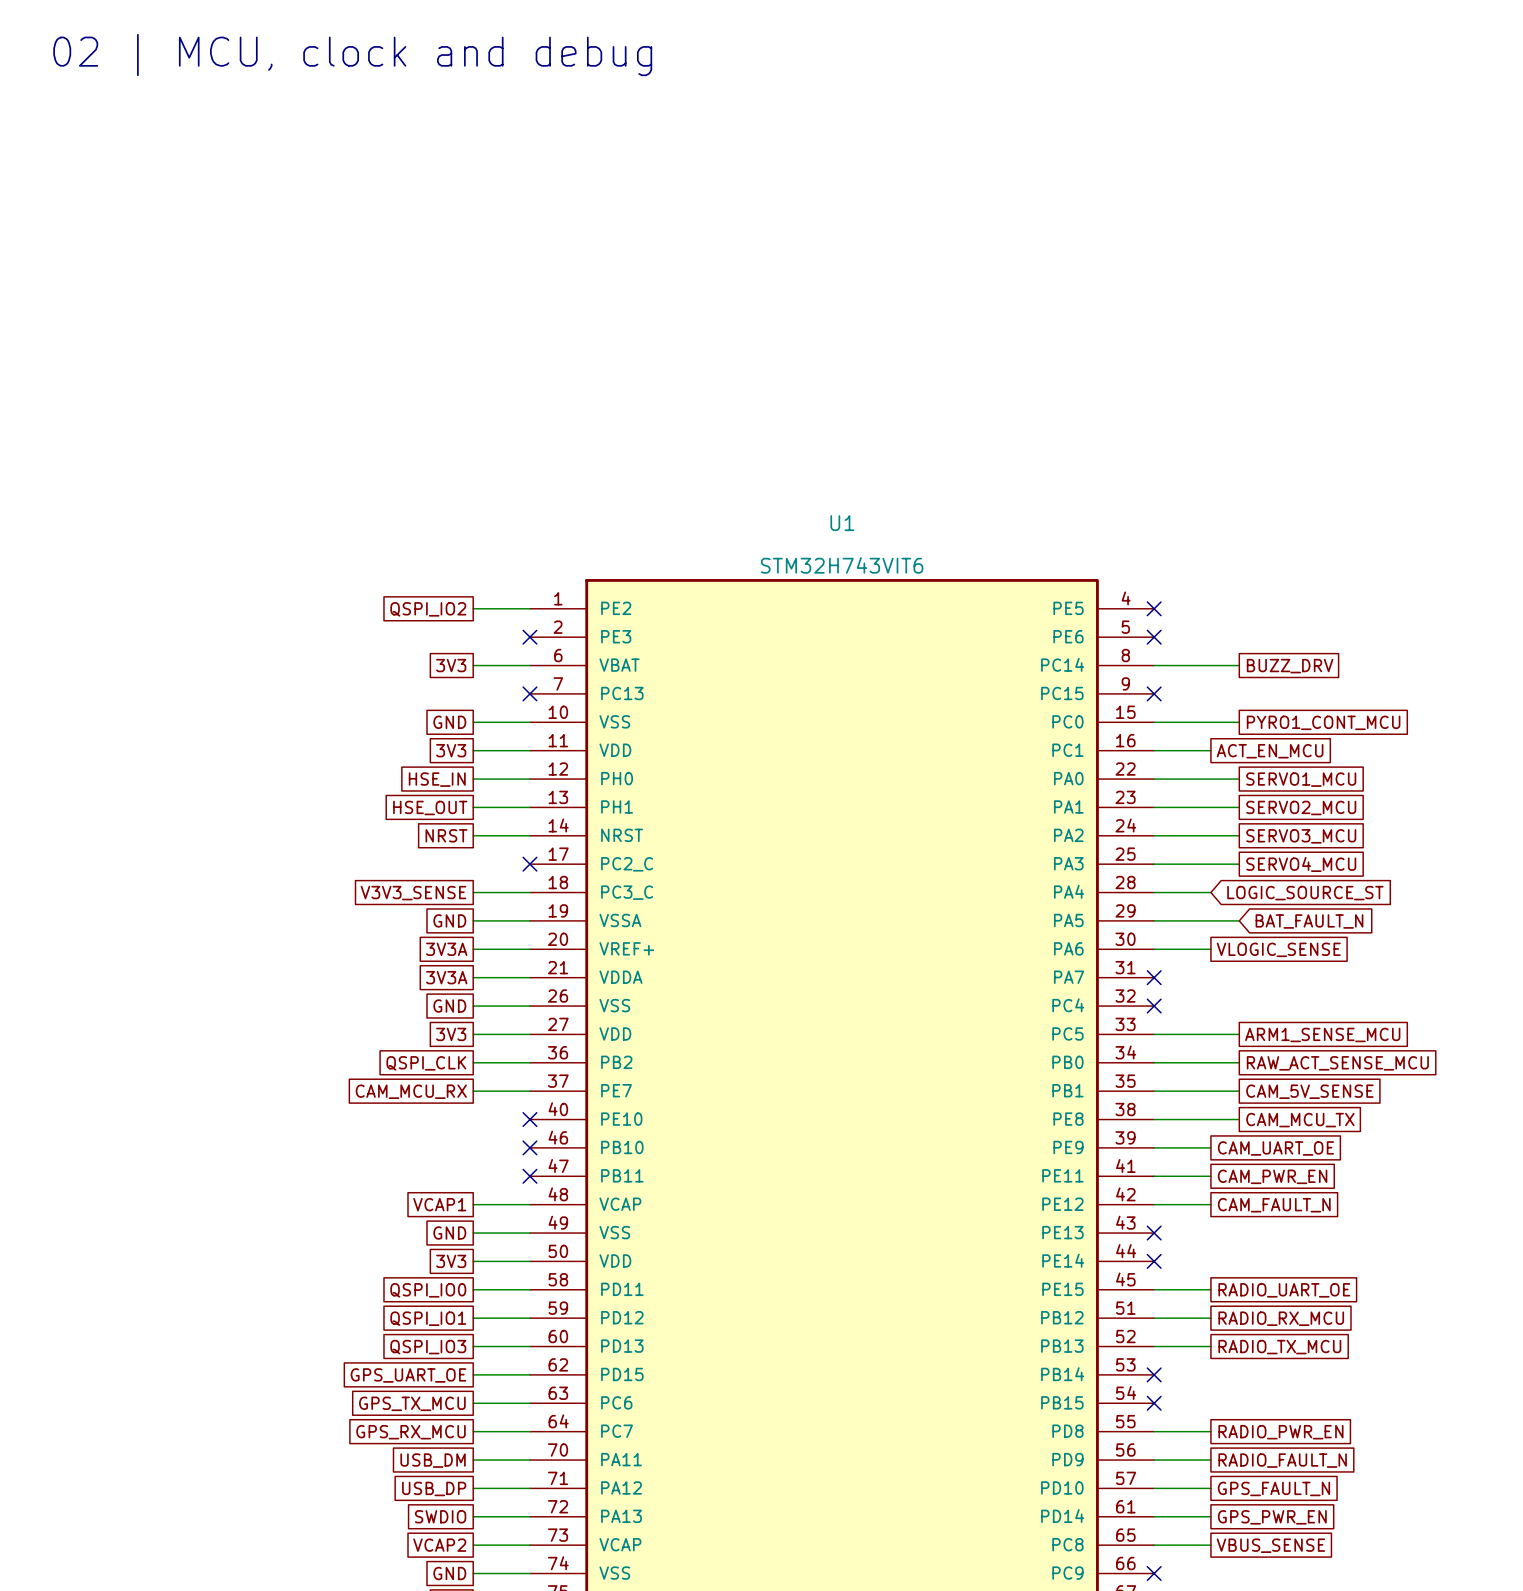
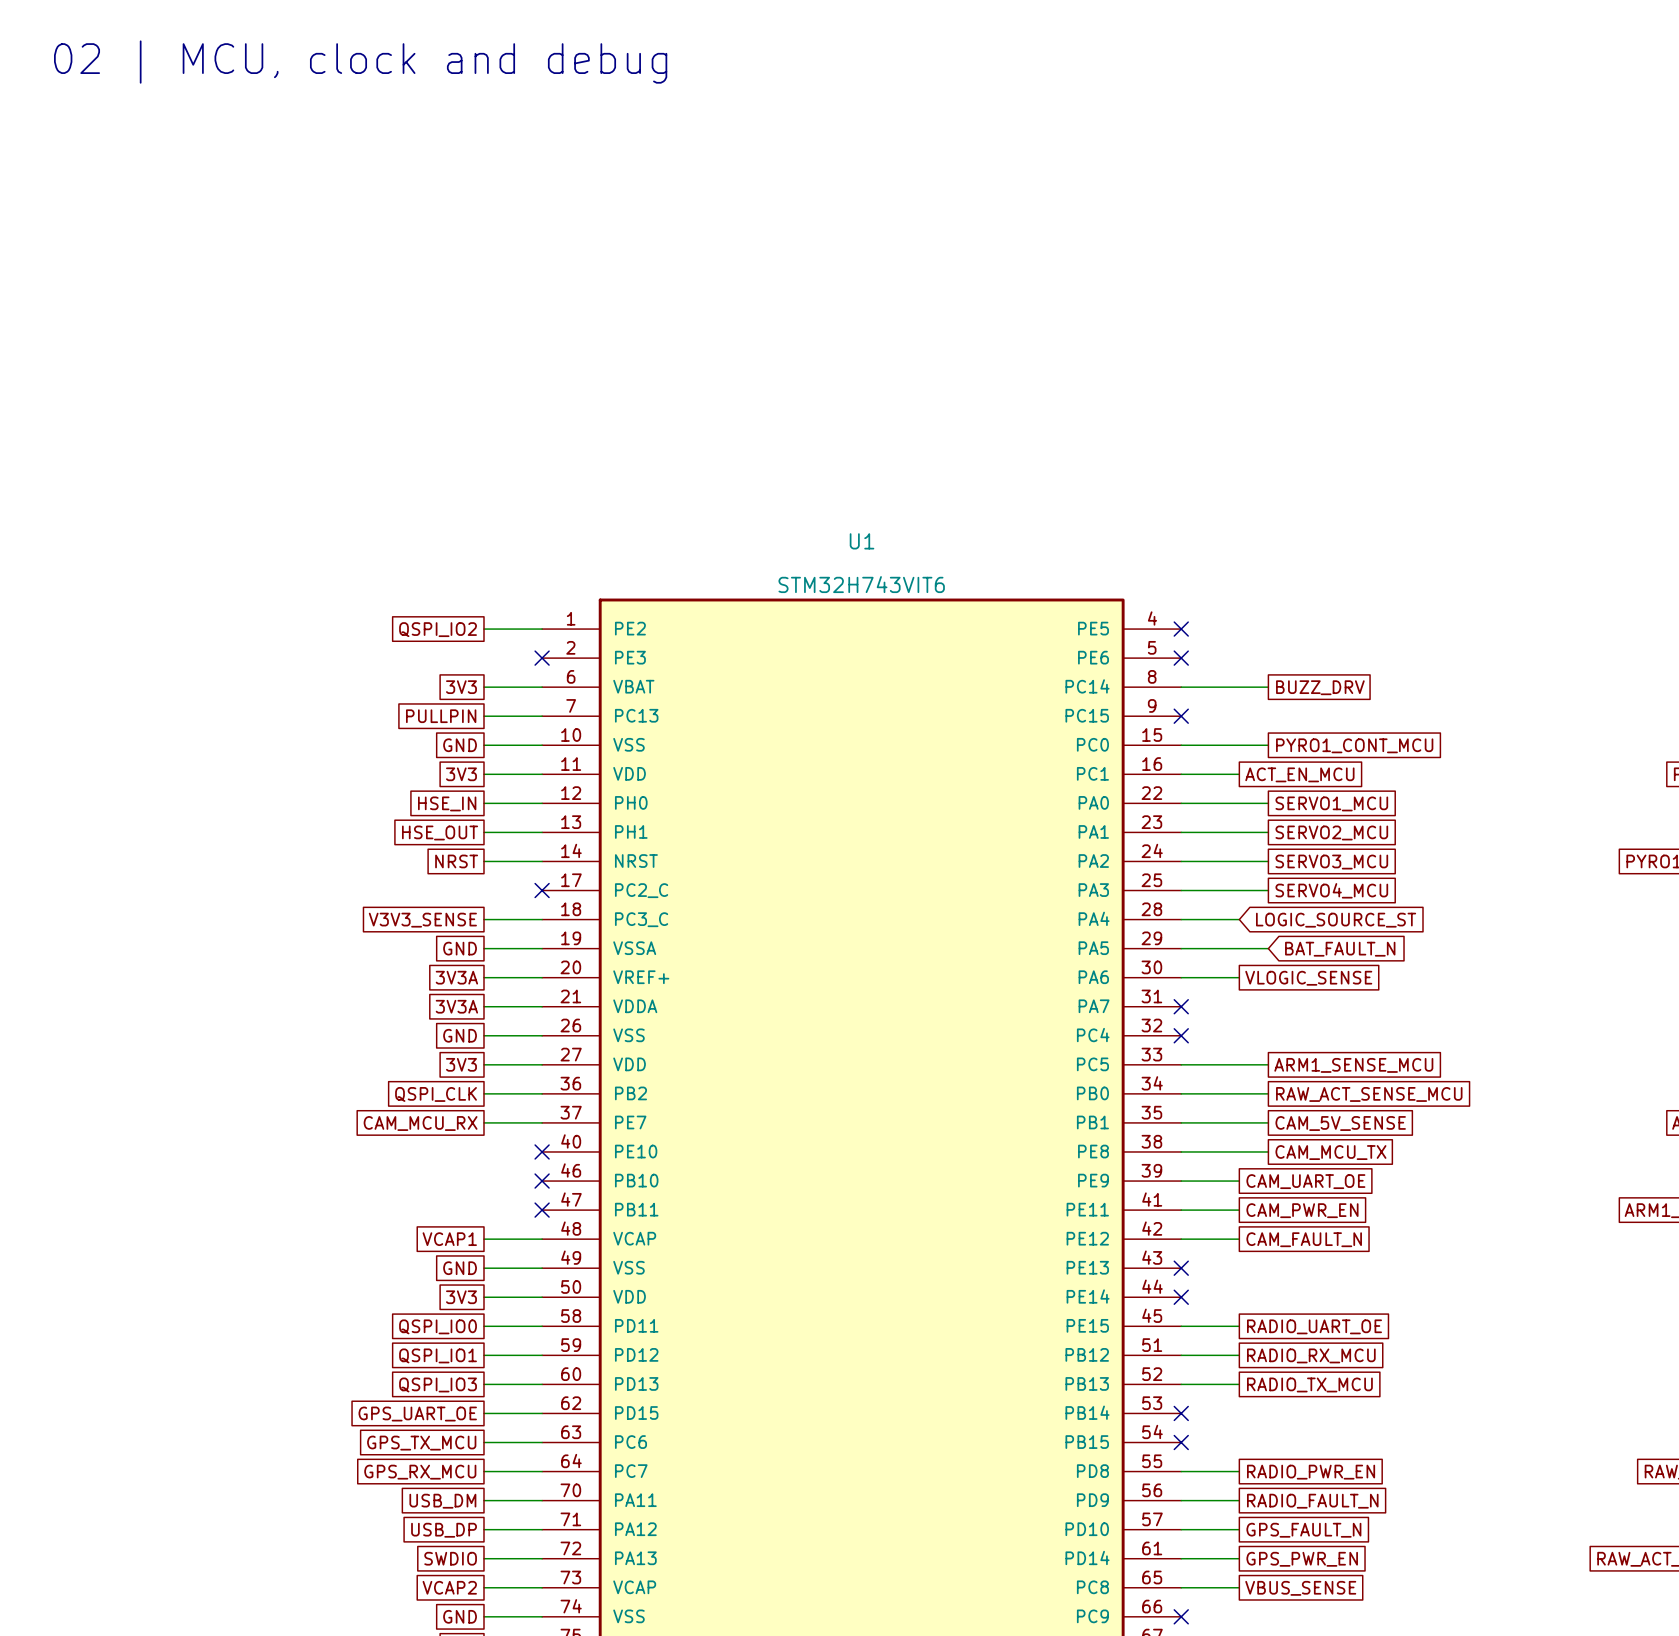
global label: none -> PULLPIN (441, 716)
wire: none -> (483, 716) (542, 716)
no-connect mark: (529, 693) -> none

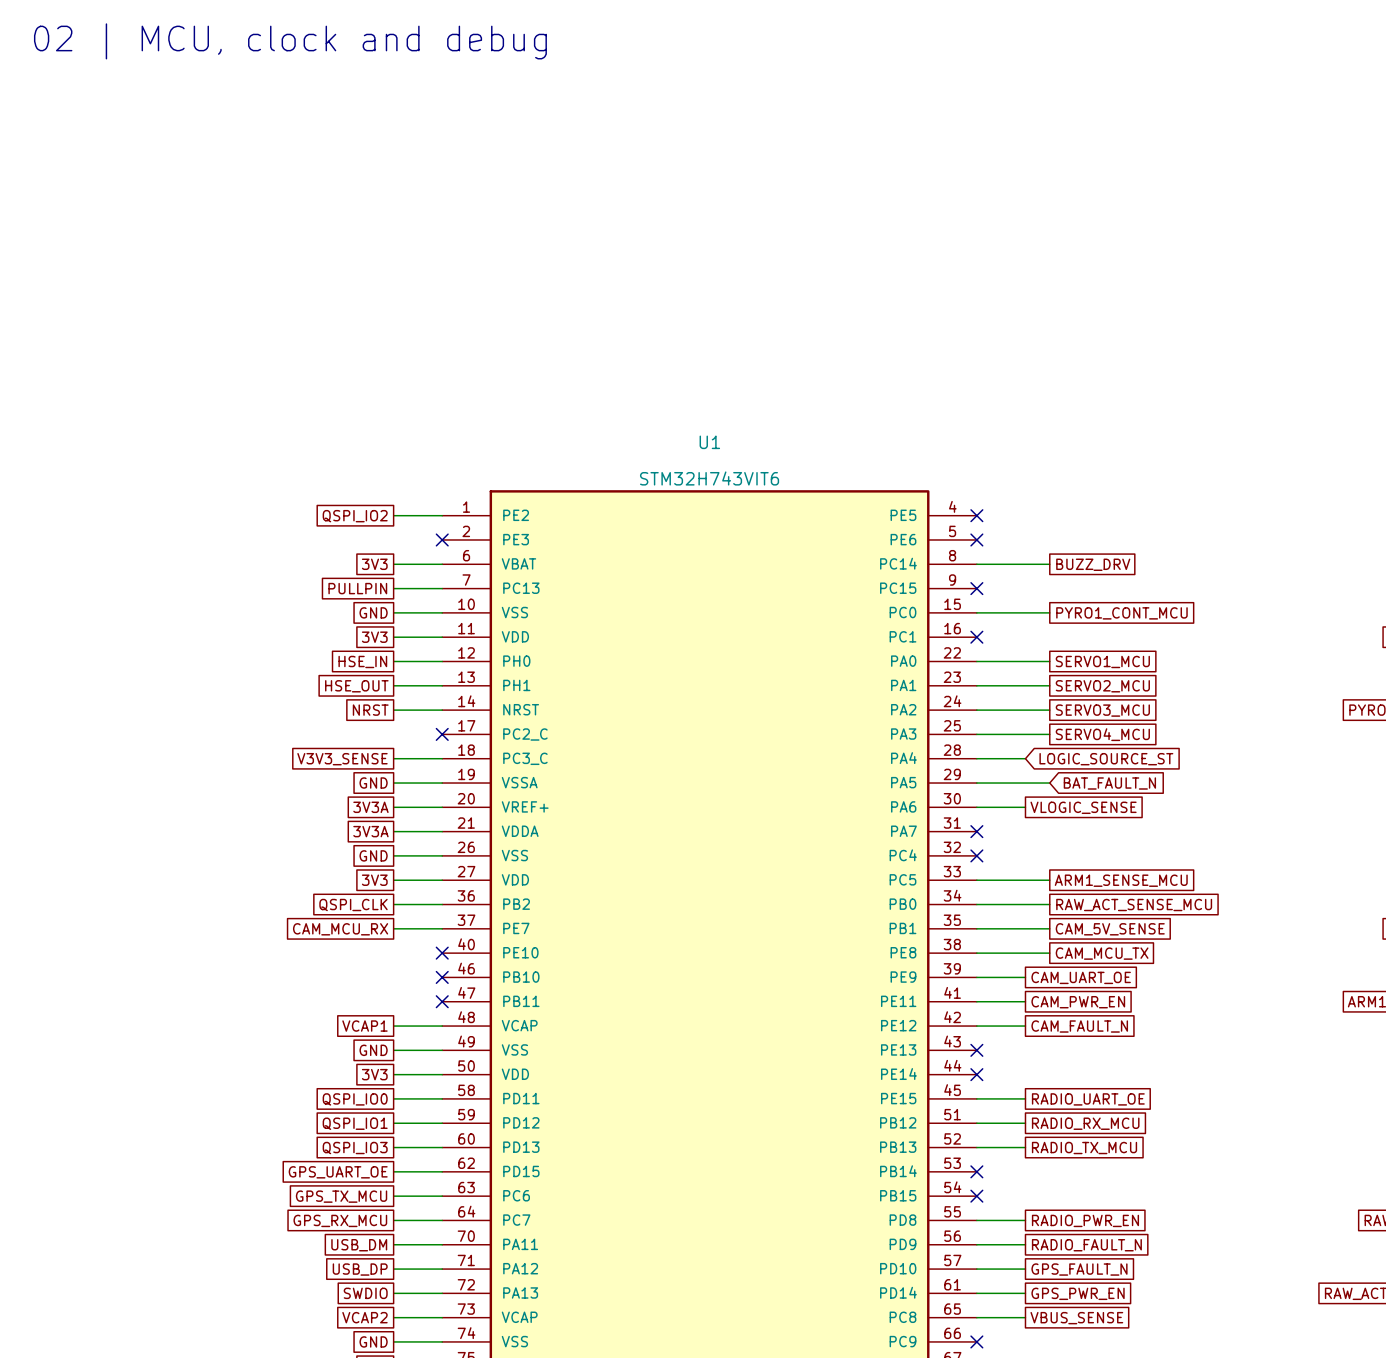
wire: (1181, 774) (1239, 774) -> none
no-connect mark: none -> (976, 637)
global label: ACT_EN_MCU (1299, 774) -> none

